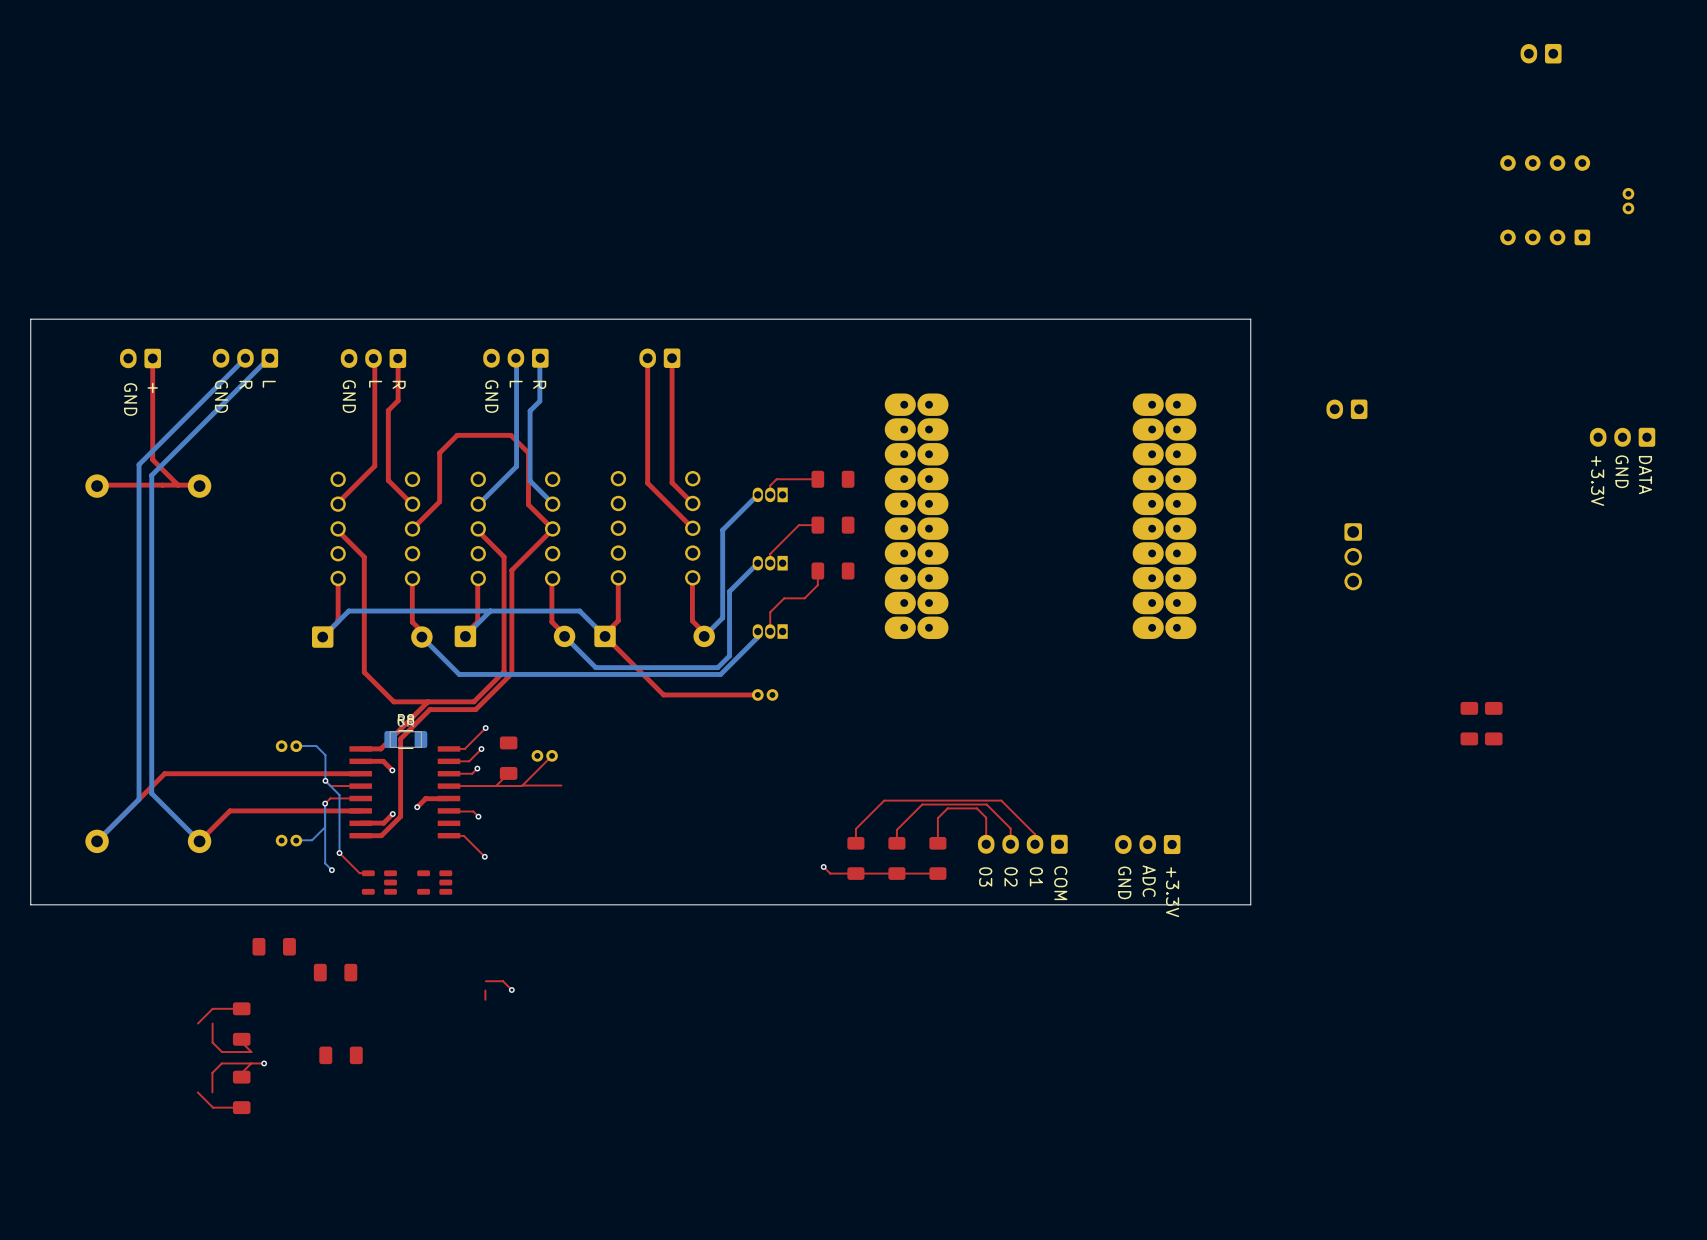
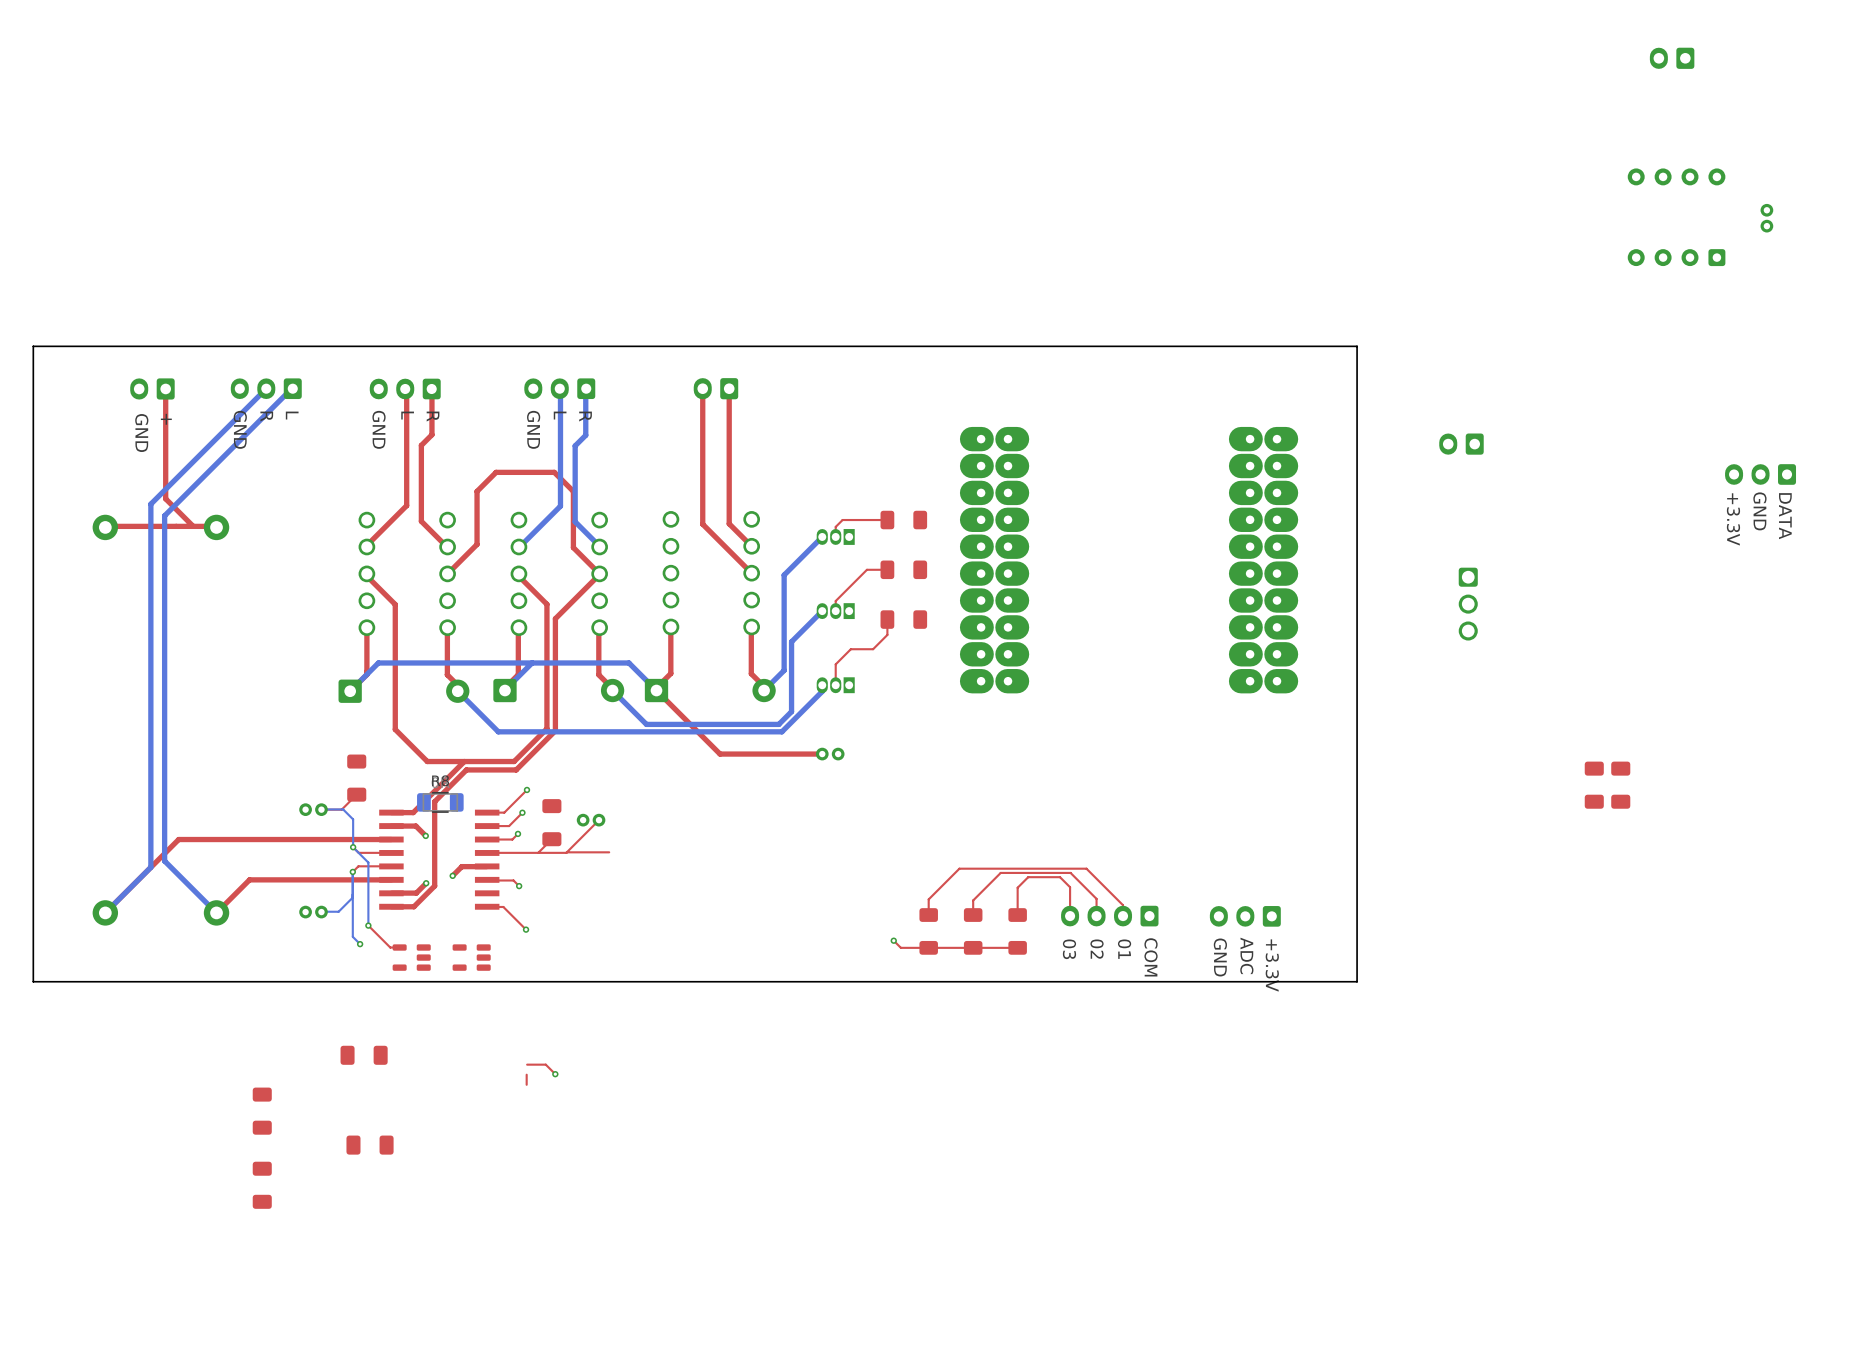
top track: none -> (356, 794) (341, 809) (321, 809)
part rotation: 0° (274, 946) -> 90° clockwise (356, 778)
part position: (274, 946) -> (356, 778)
top track: (241, 1008) (212, 1008) (197, 1023) -> none
top track: (212, 1023) (212, 1042) (222, 1052) (251, 1052) (241, 1042) -> none
top track: (251, 1063) (241, 1073) -> none
top track: (264, 1063) (221, 1063) (212, 1072) (212, 1092) -> none
via: (264, 1063) -> none
top track: (197, 1092) (213, 1107) (241, 1107) -> none

